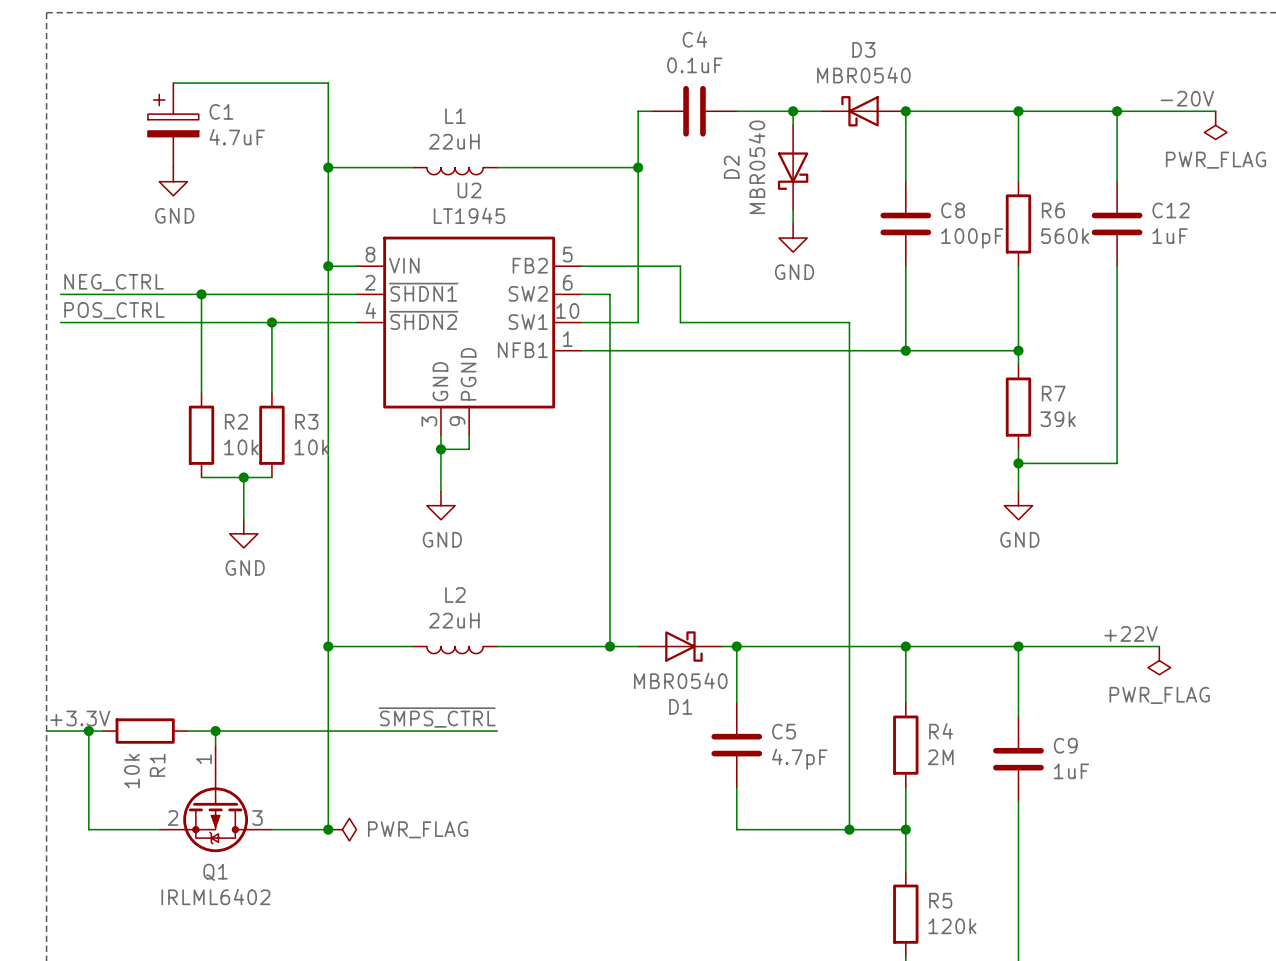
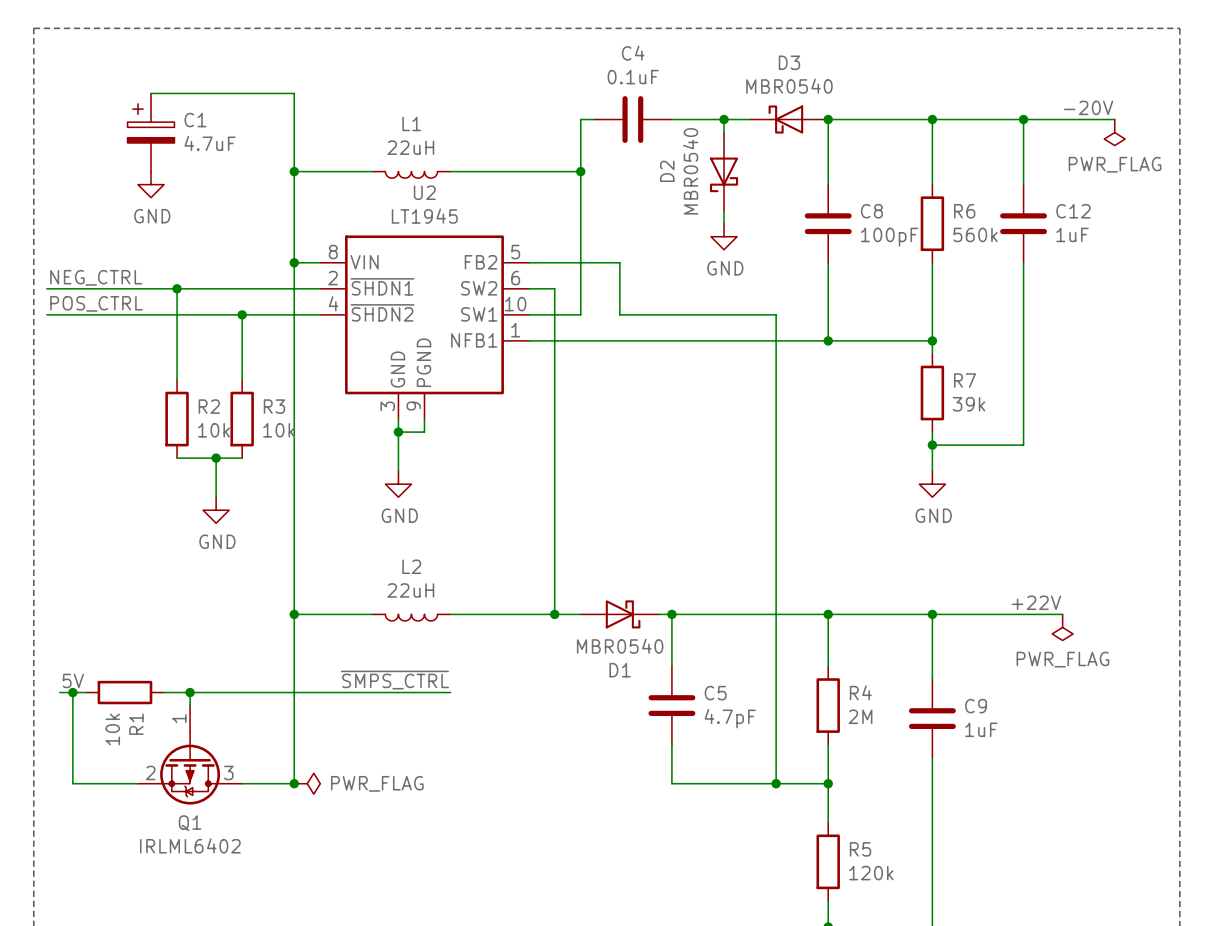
label: +3.3V (80, 718) -> none
label: none -> 5V (73, 680)
wire: (46, 731) (74, 731) -> none

